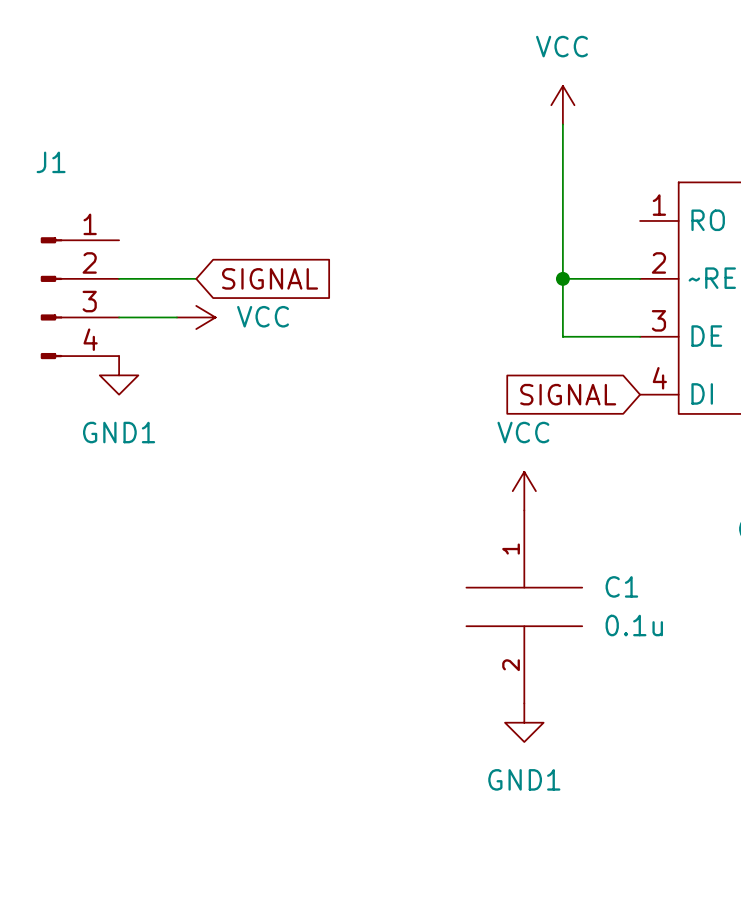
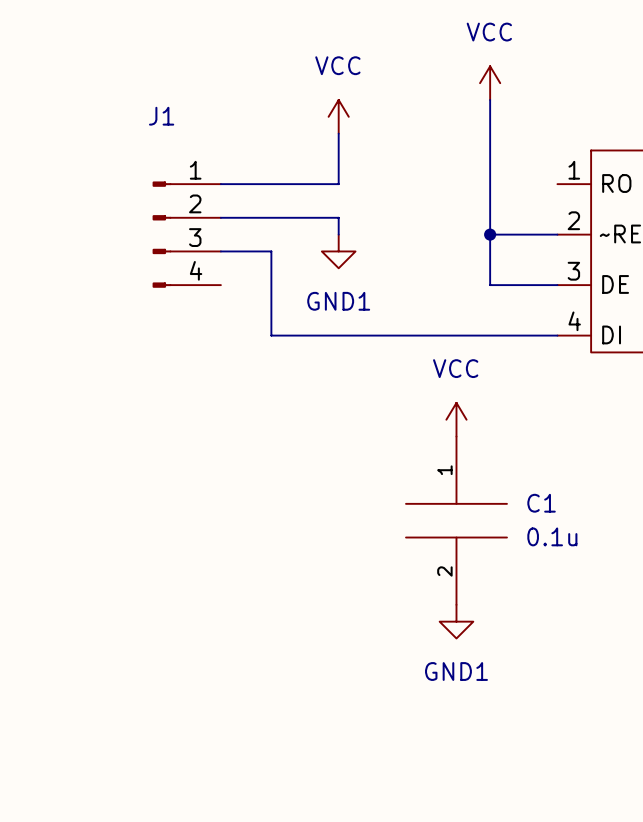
wire: none -> (338, 133) (338, 184) (220, 184)
wire: none -> (220, 217) (338, 217) (338, 234)
wire: (119, 278) (196, 278) -> none
global label: SIGNAL (270, 278) -> none
J1 position: (79, 298) -> (186, 234)
wire: none -> (220, 251) (271, 251) (271, 335) (557, 335)
wire: (119, 317) (176, 317) -> none
power symbol rotation: 0° (196, 317) -> 90° counterclockwise (338, 116)
power symbol position: VCC (196, 317) -> VCC (338, 116)
power symbol position: GND1 (119, 375) -> GND1 (338, 251)
global label: SIGNAL (568, 394) -> none

